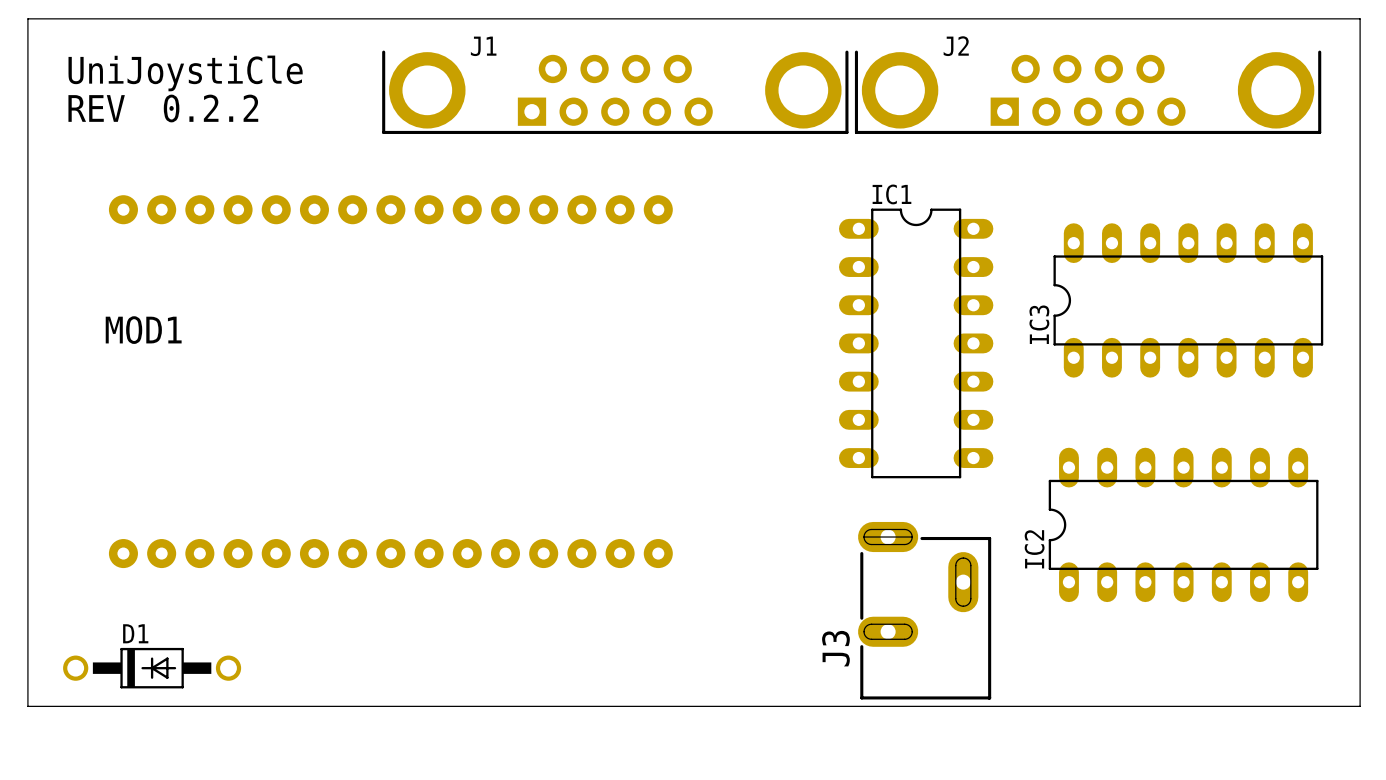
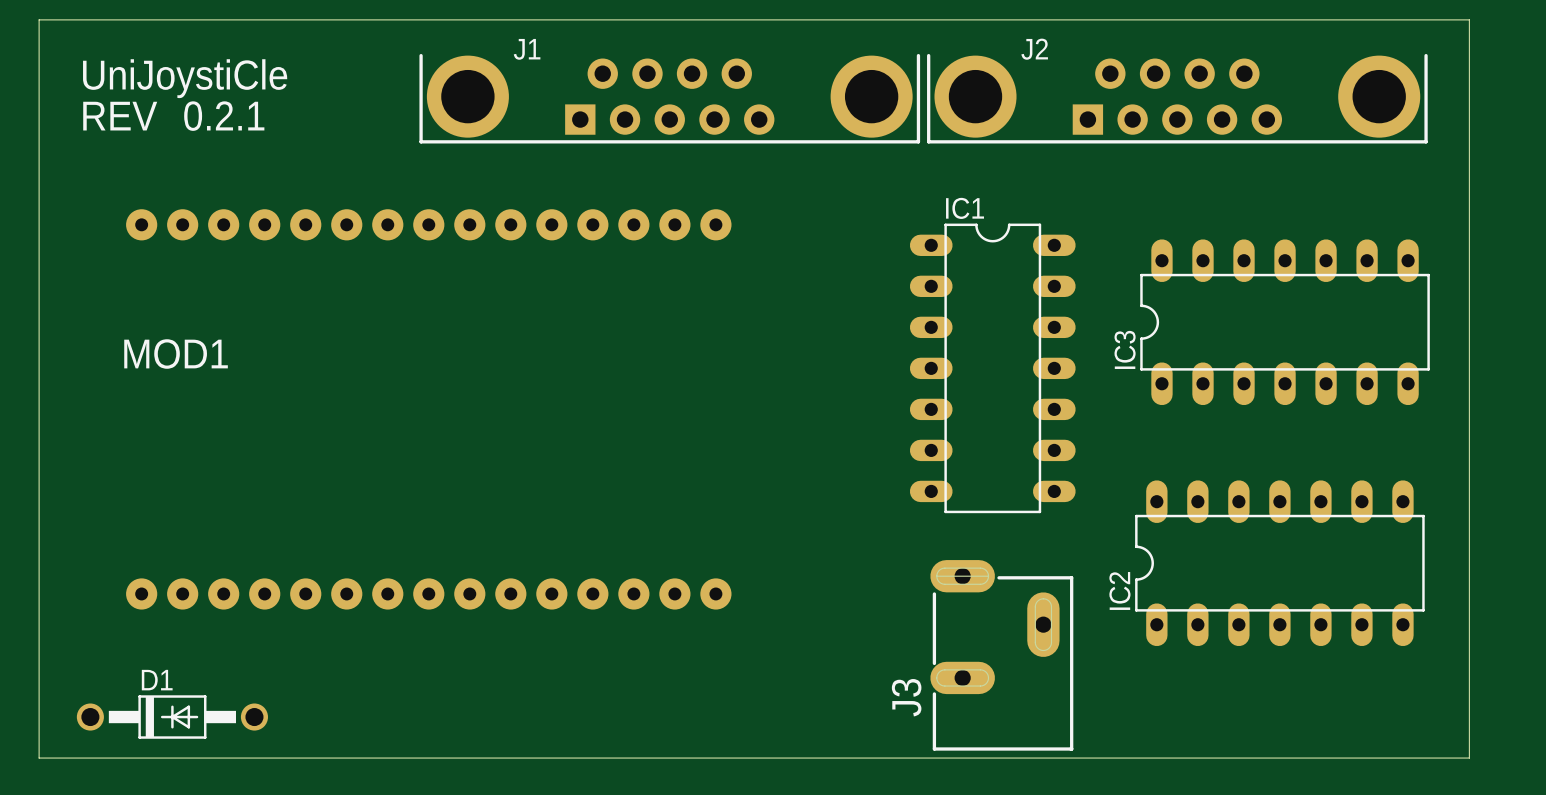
text: 0.2.2 (211, 108) -> 0.2.1 (224, 116)

